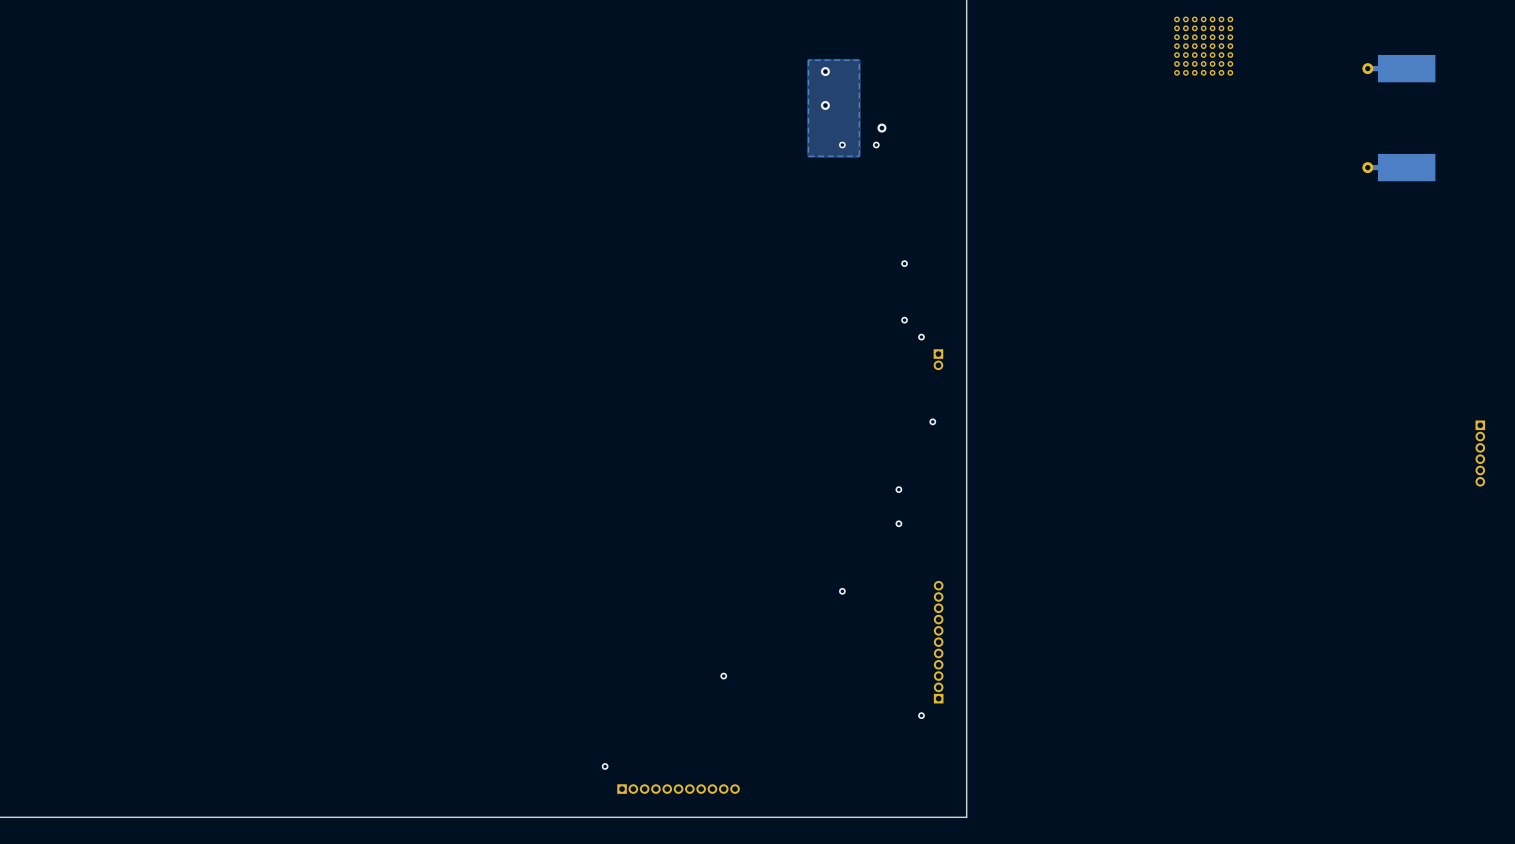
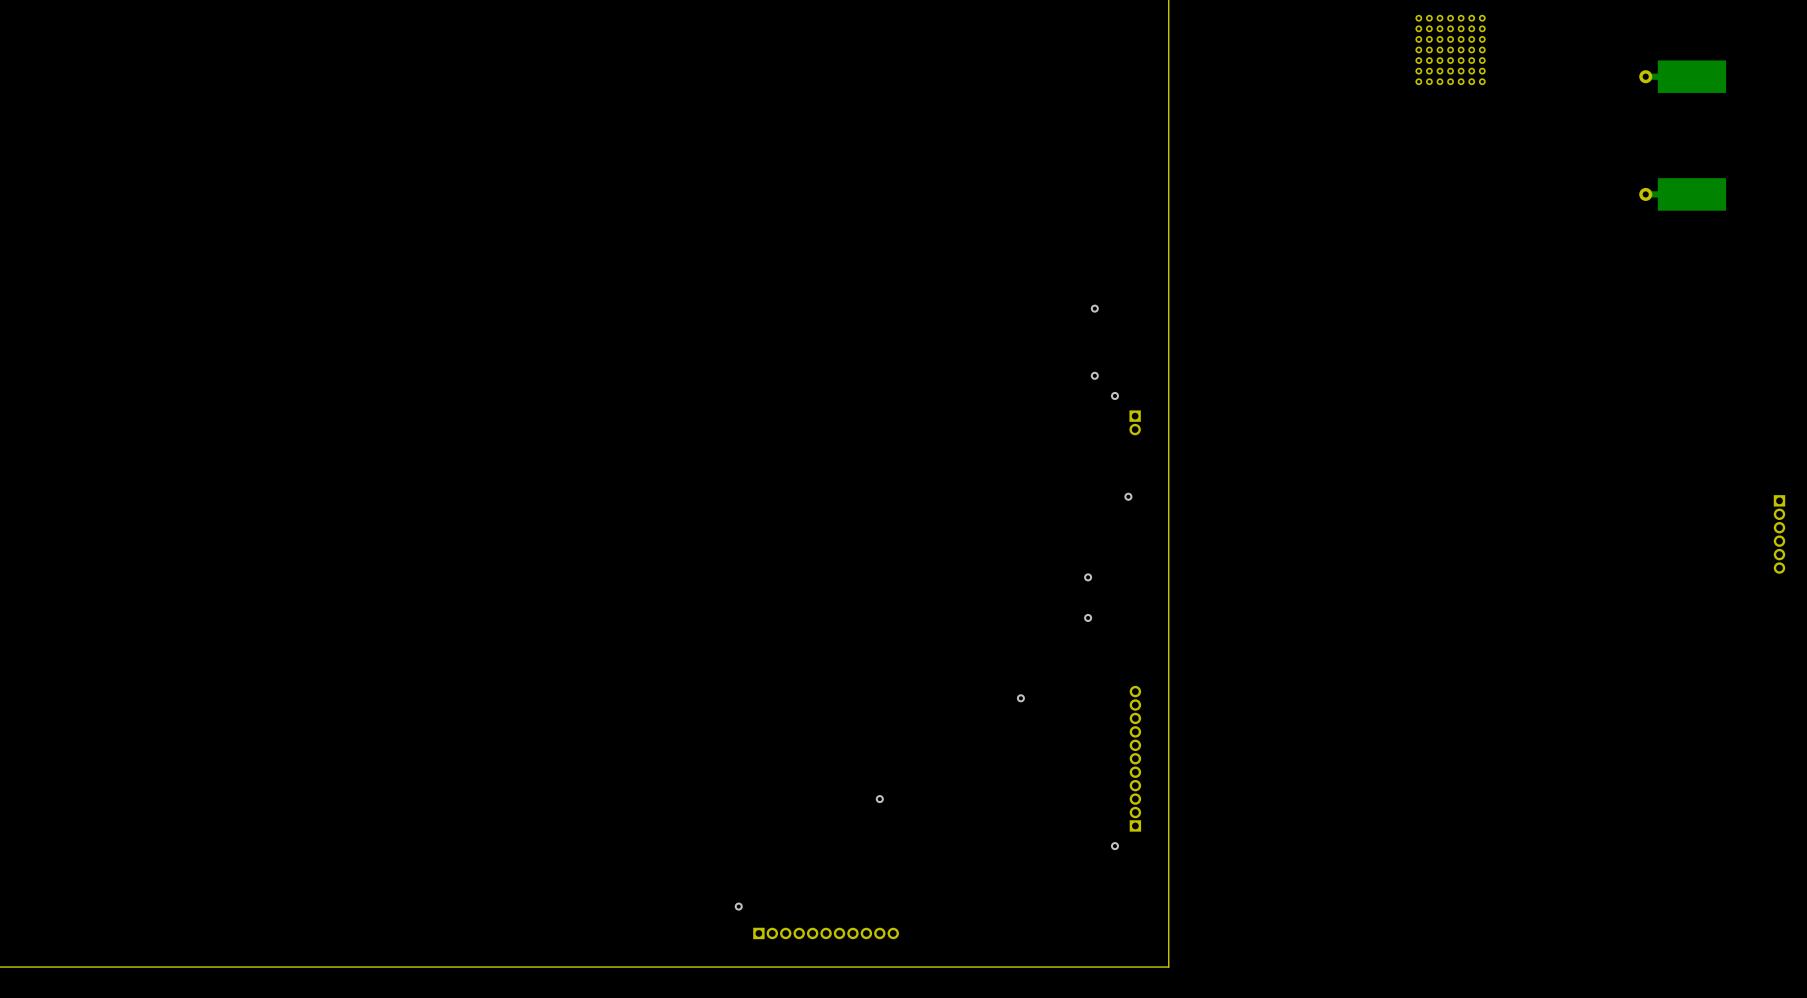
zone outline: (859, 60) (859, 156) (808, 156) (808, 60) (859, 60) -> none
via: (825, 71) -> none
via: (825, 105) -> none
via: (881, 128) -> none
via: (842, 145) -> none
via: (876, 145) -> none

